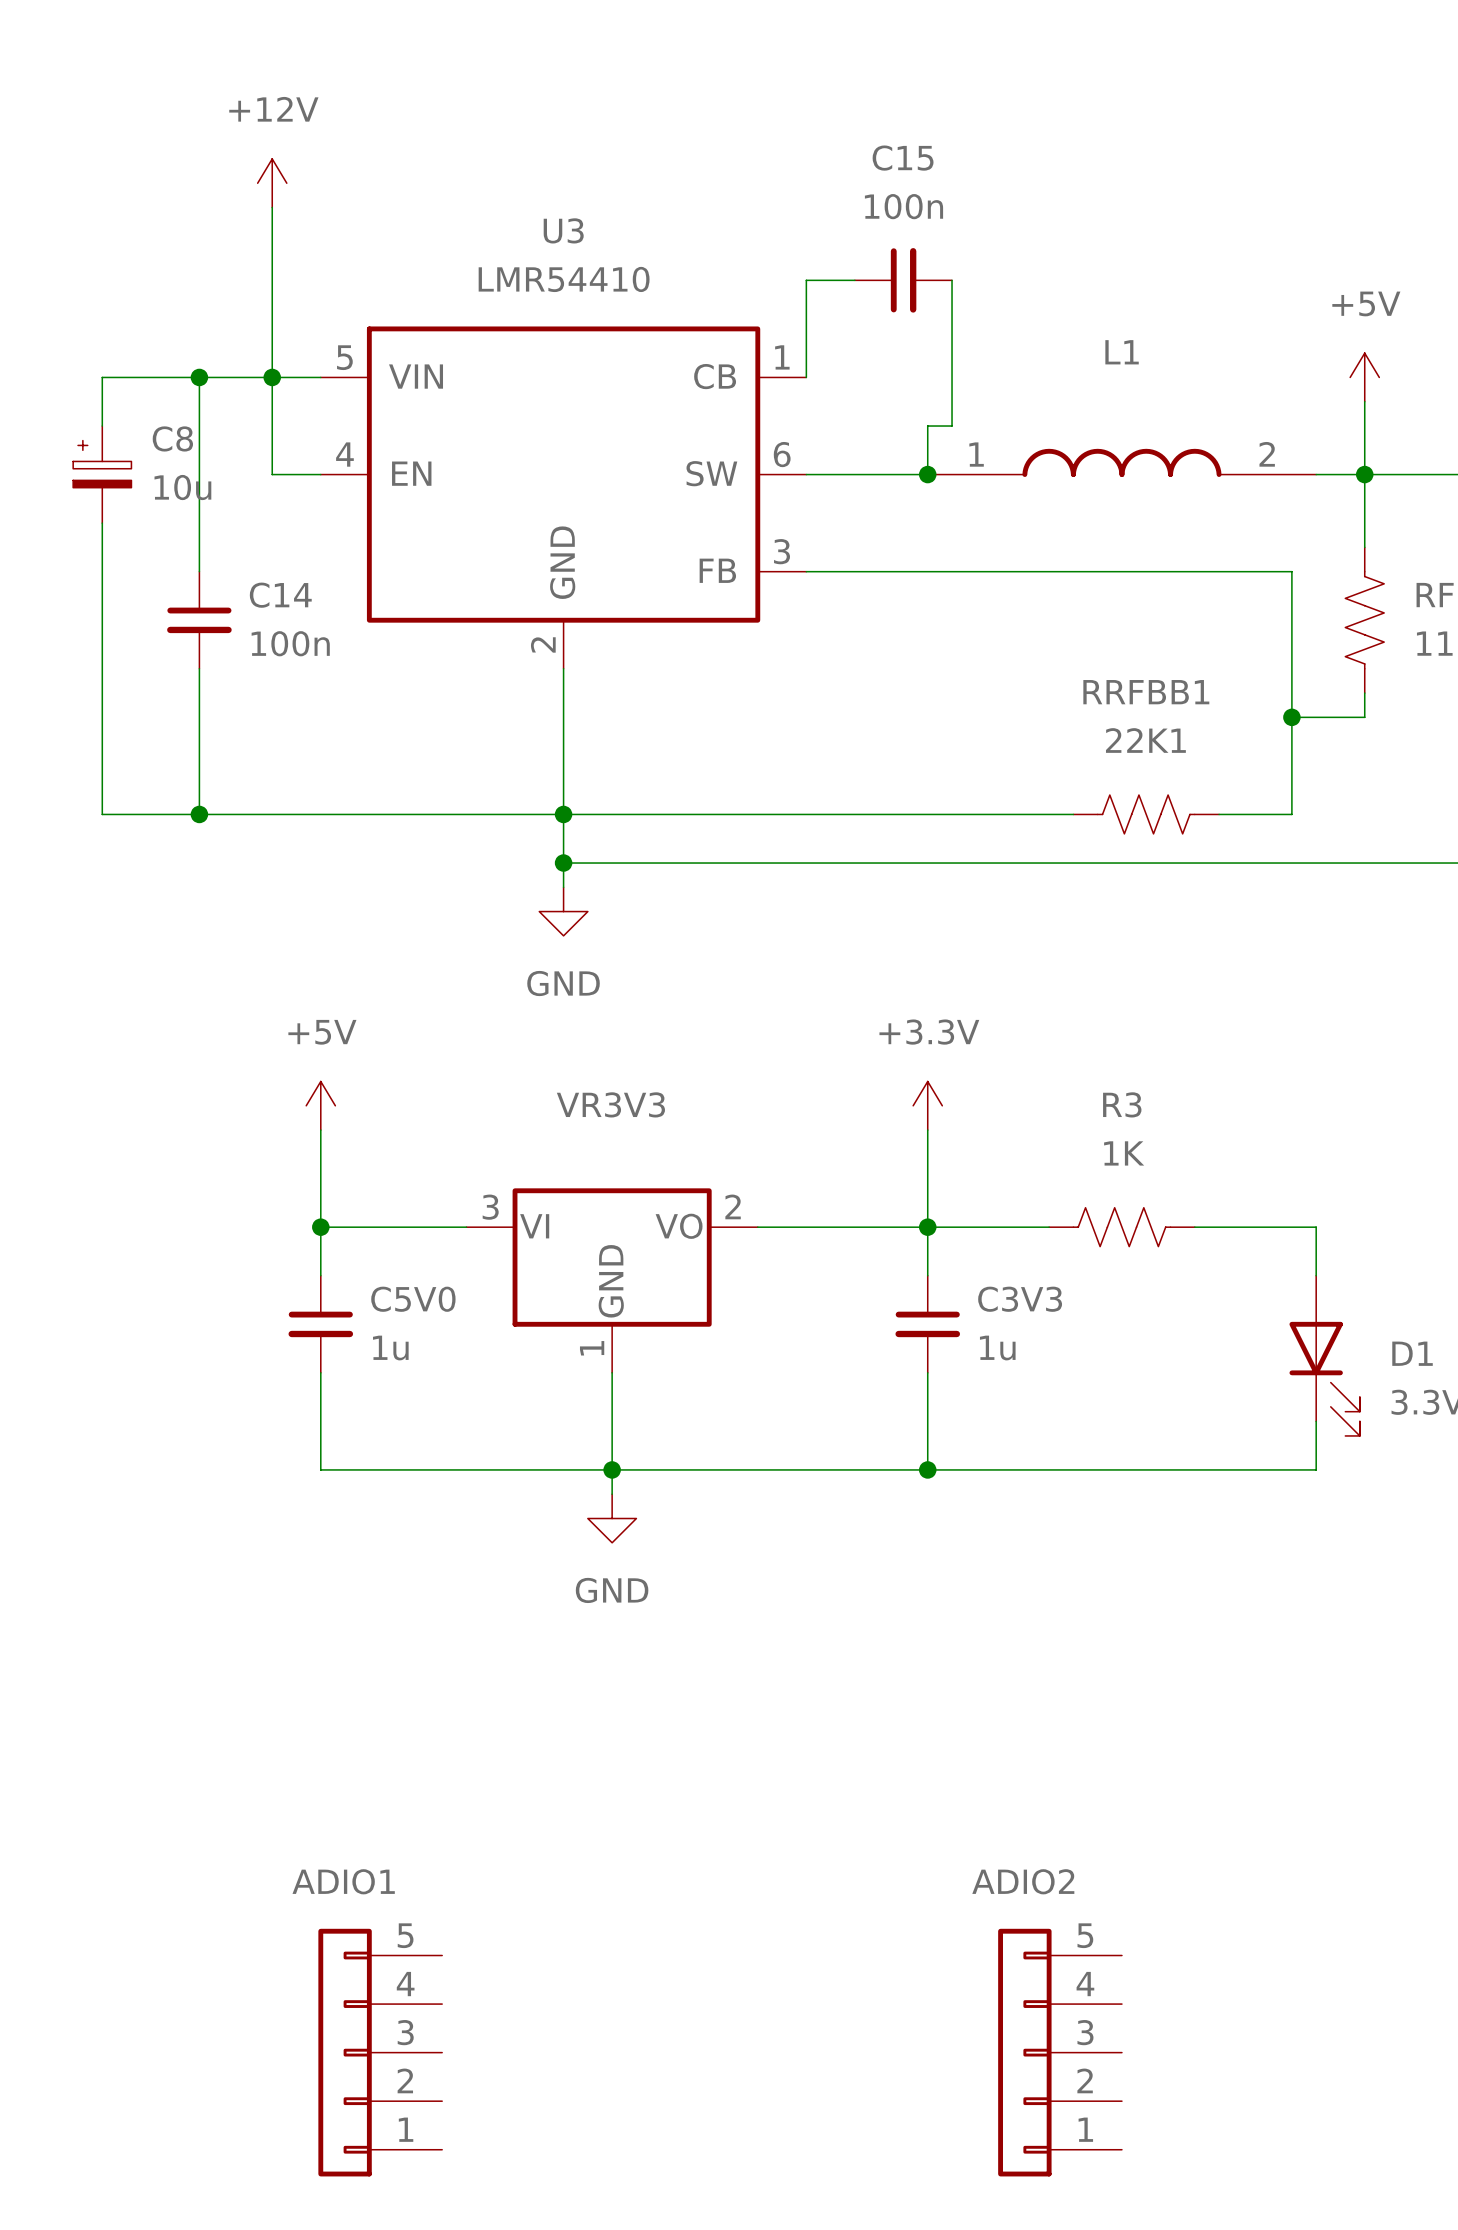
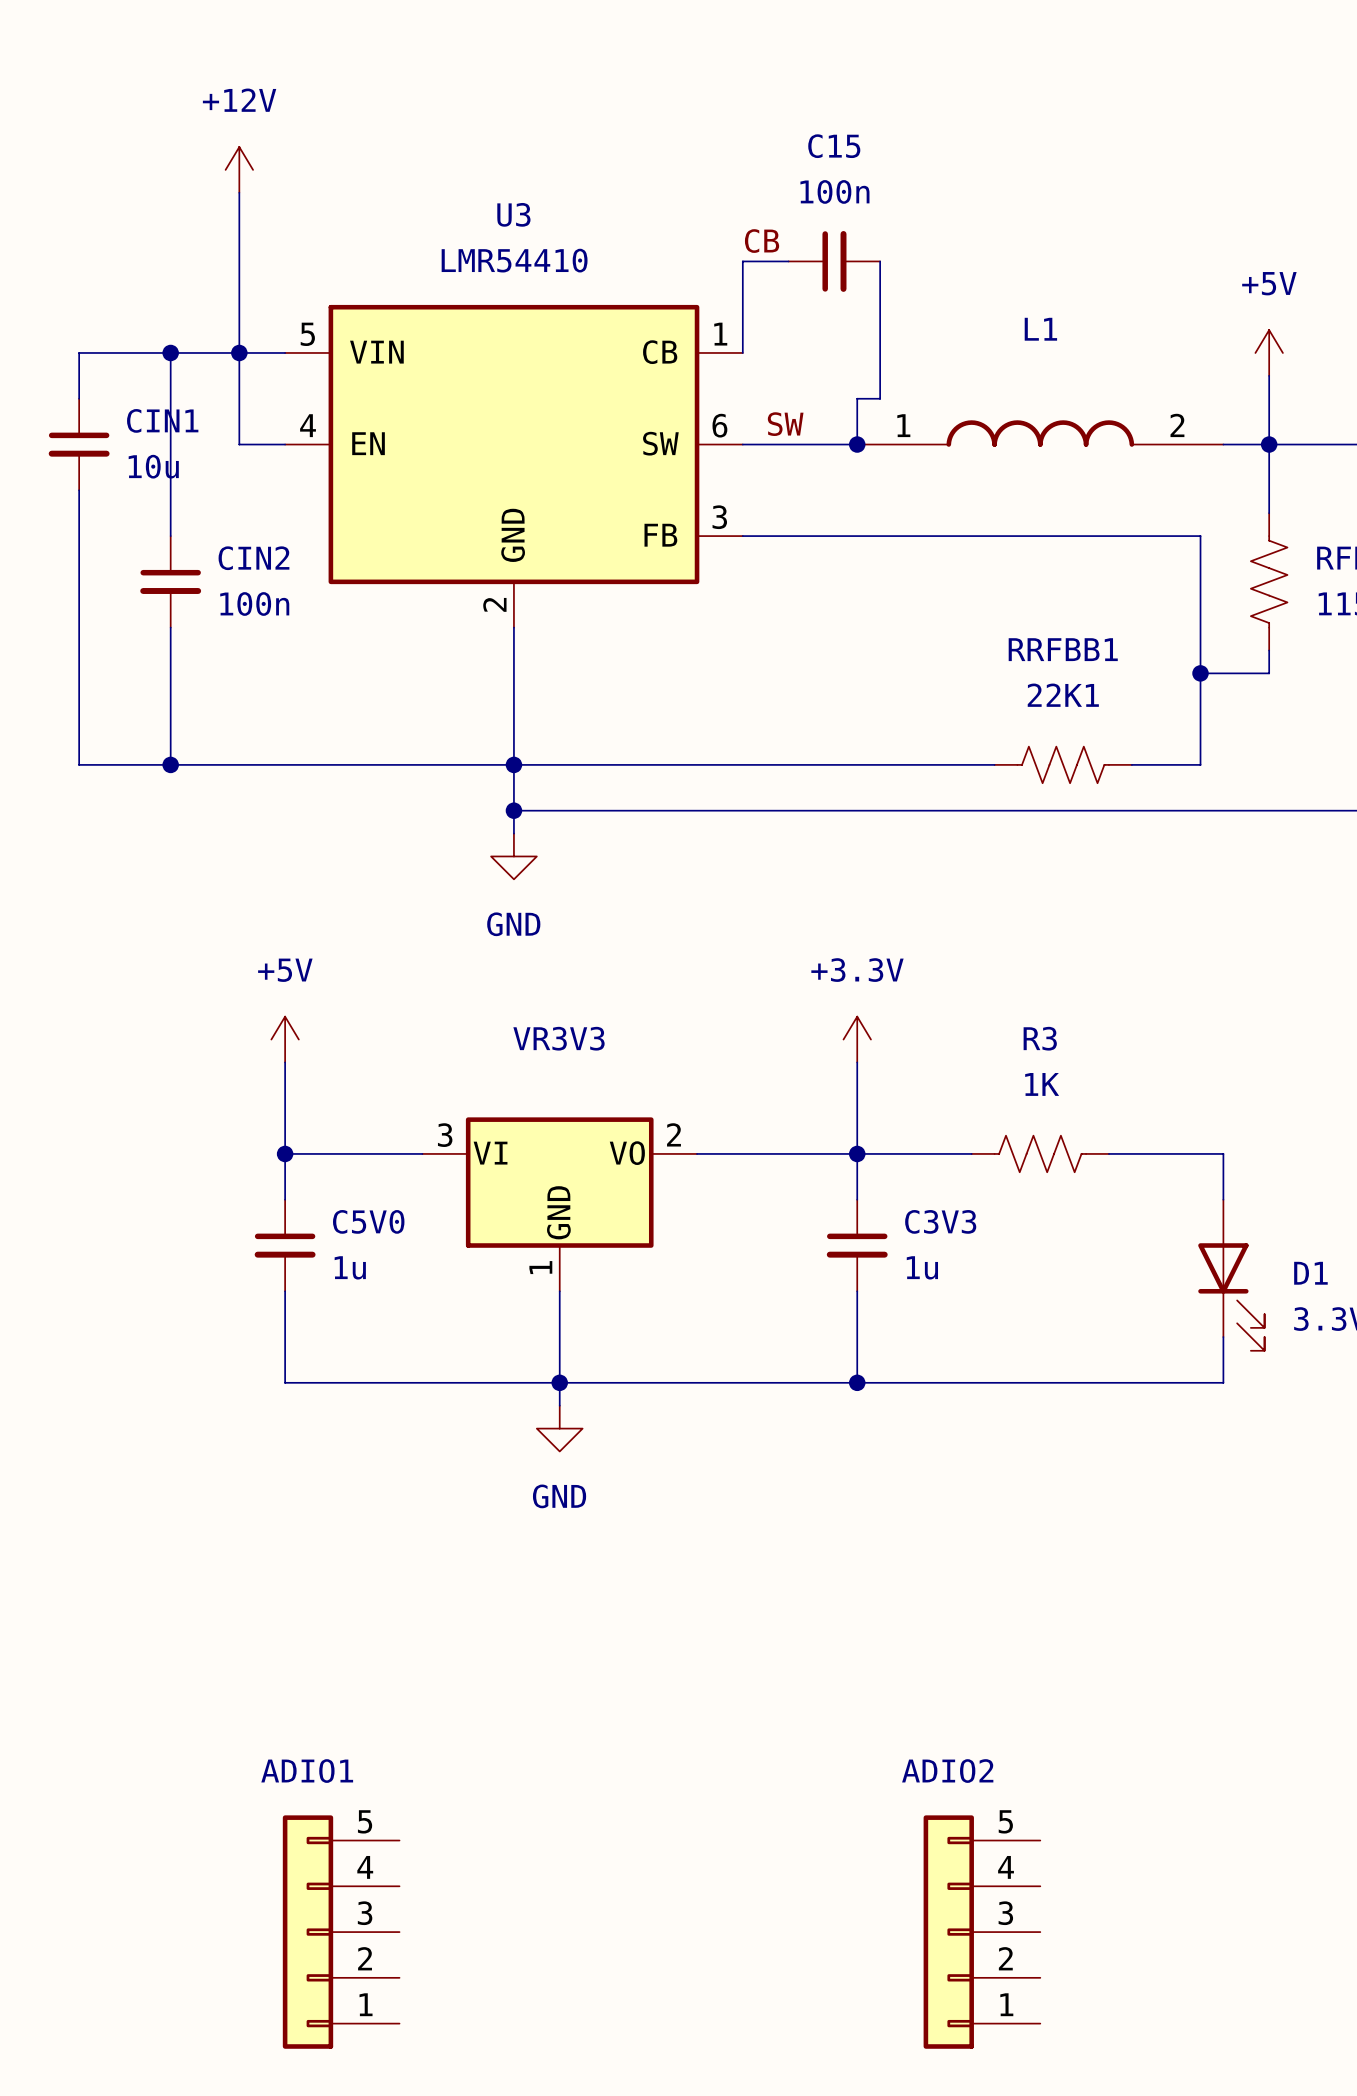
label: none -> CB (762, 241)
label: none -> SW (785, 424)
C8: 10u (102, 474) -> none
CIN1: none -> 10u (79, 444)
C14 name: C14 (280, 595) -> CIN2 (253, 558)

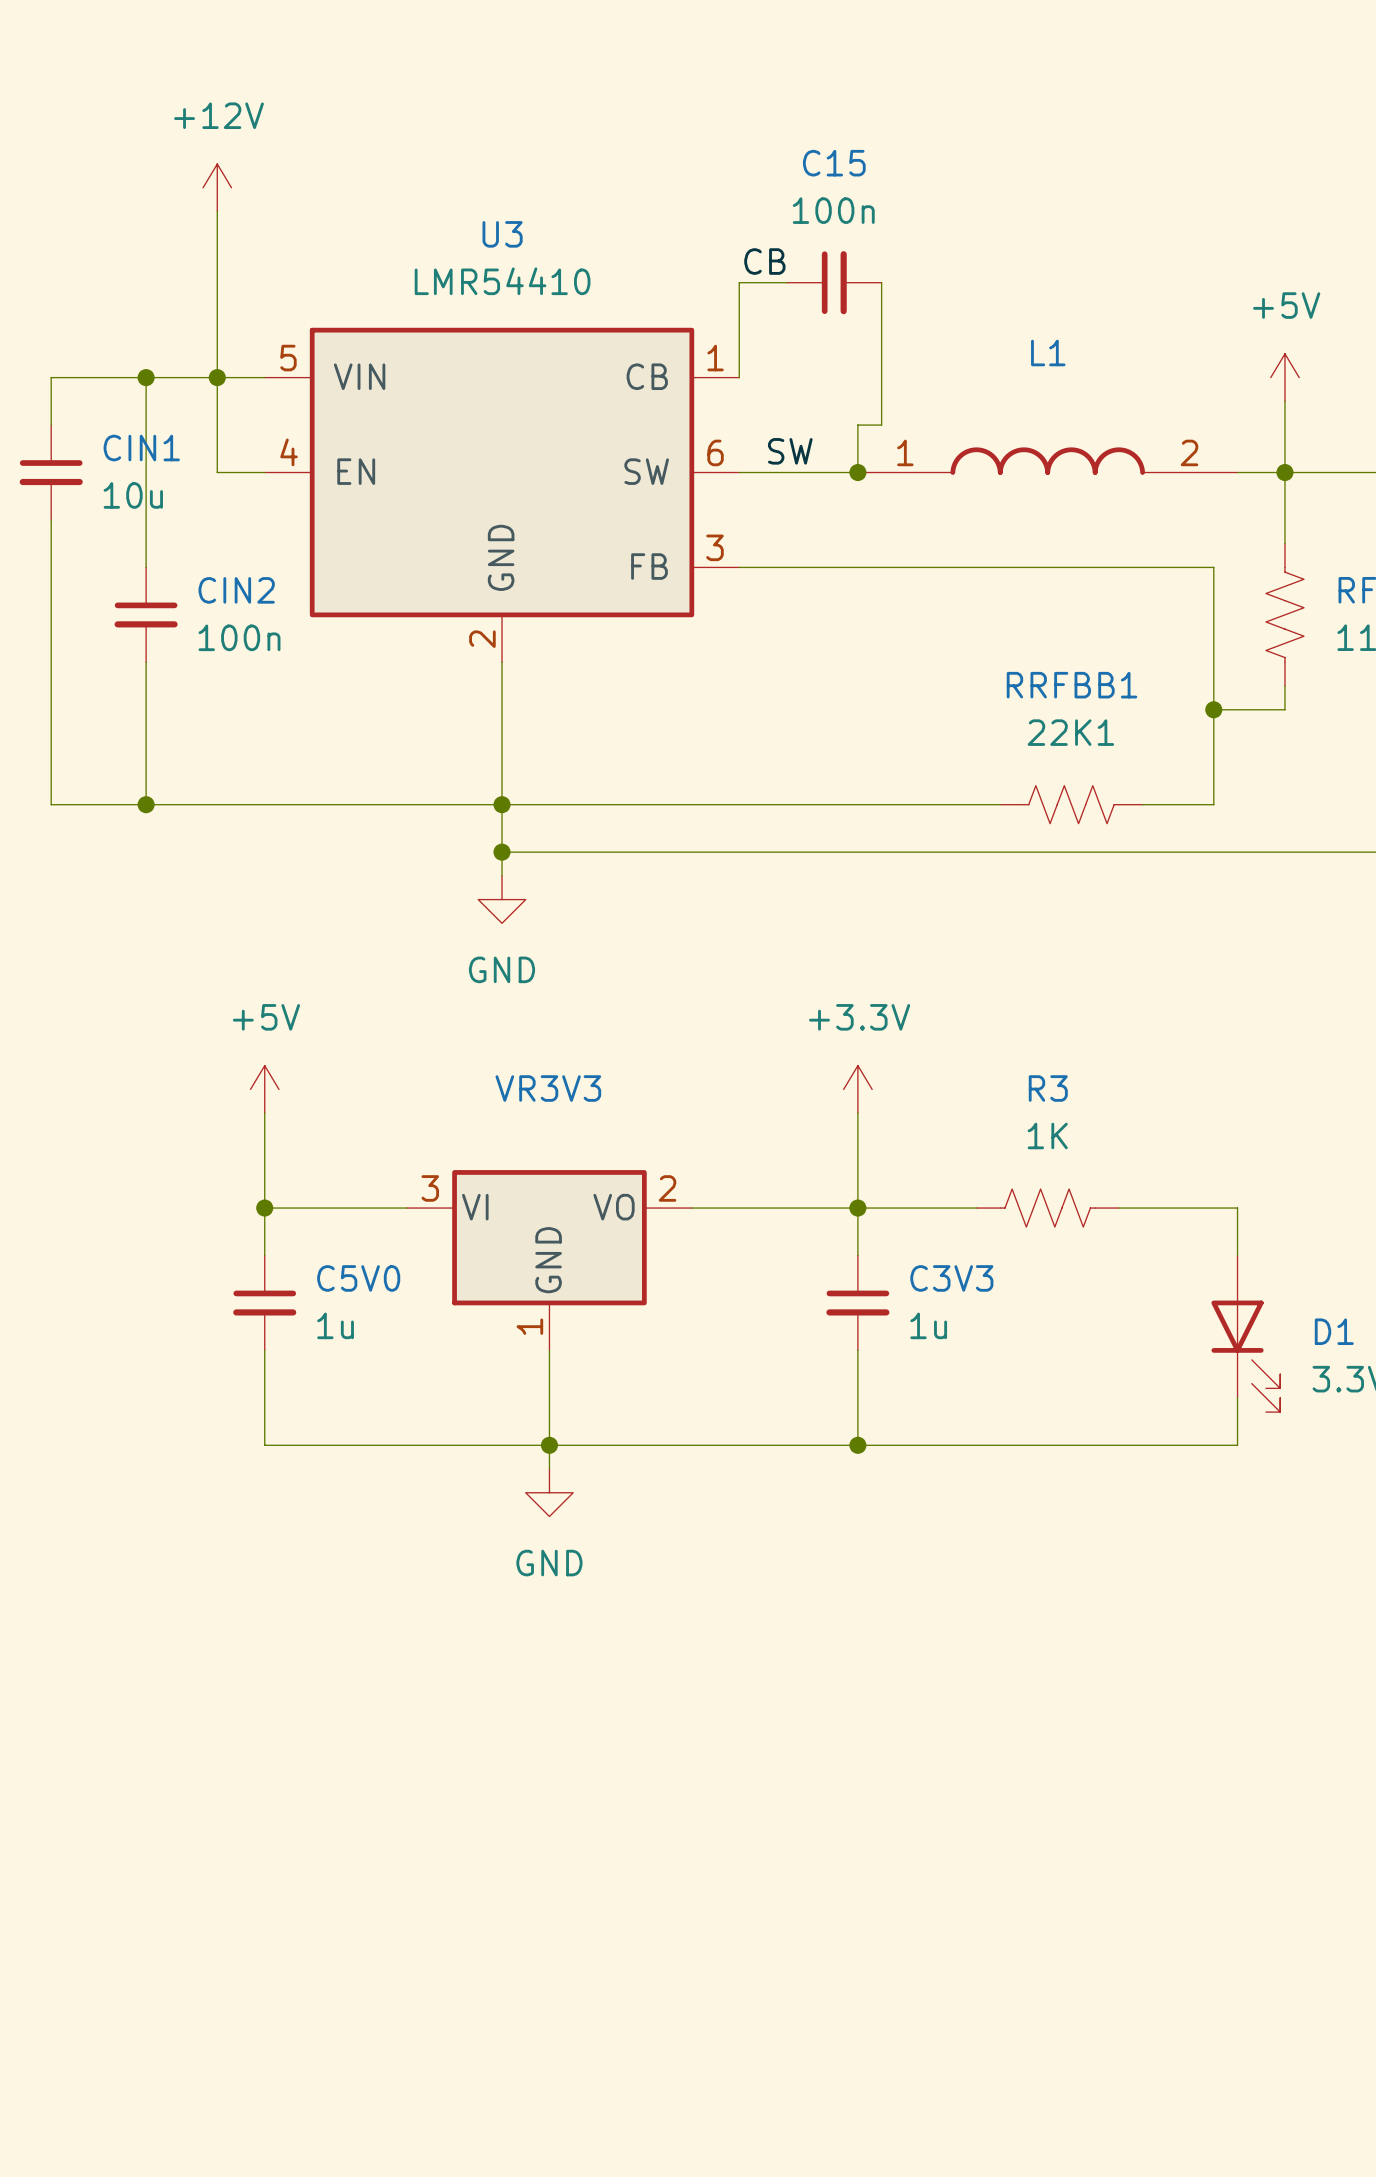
ADIO1: (341, 1932) -> none
ADIO2: (981, 1932) -> none

